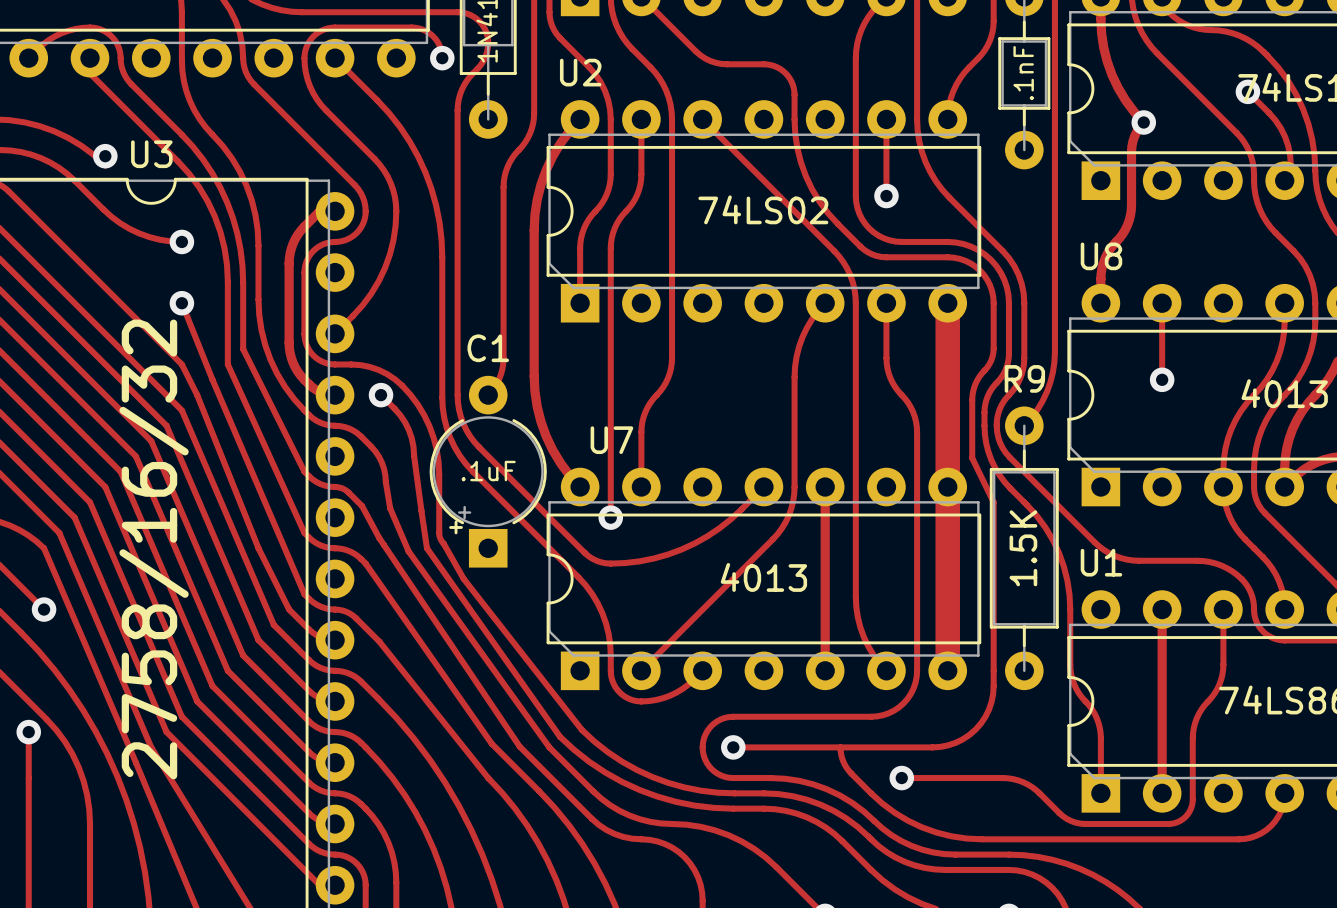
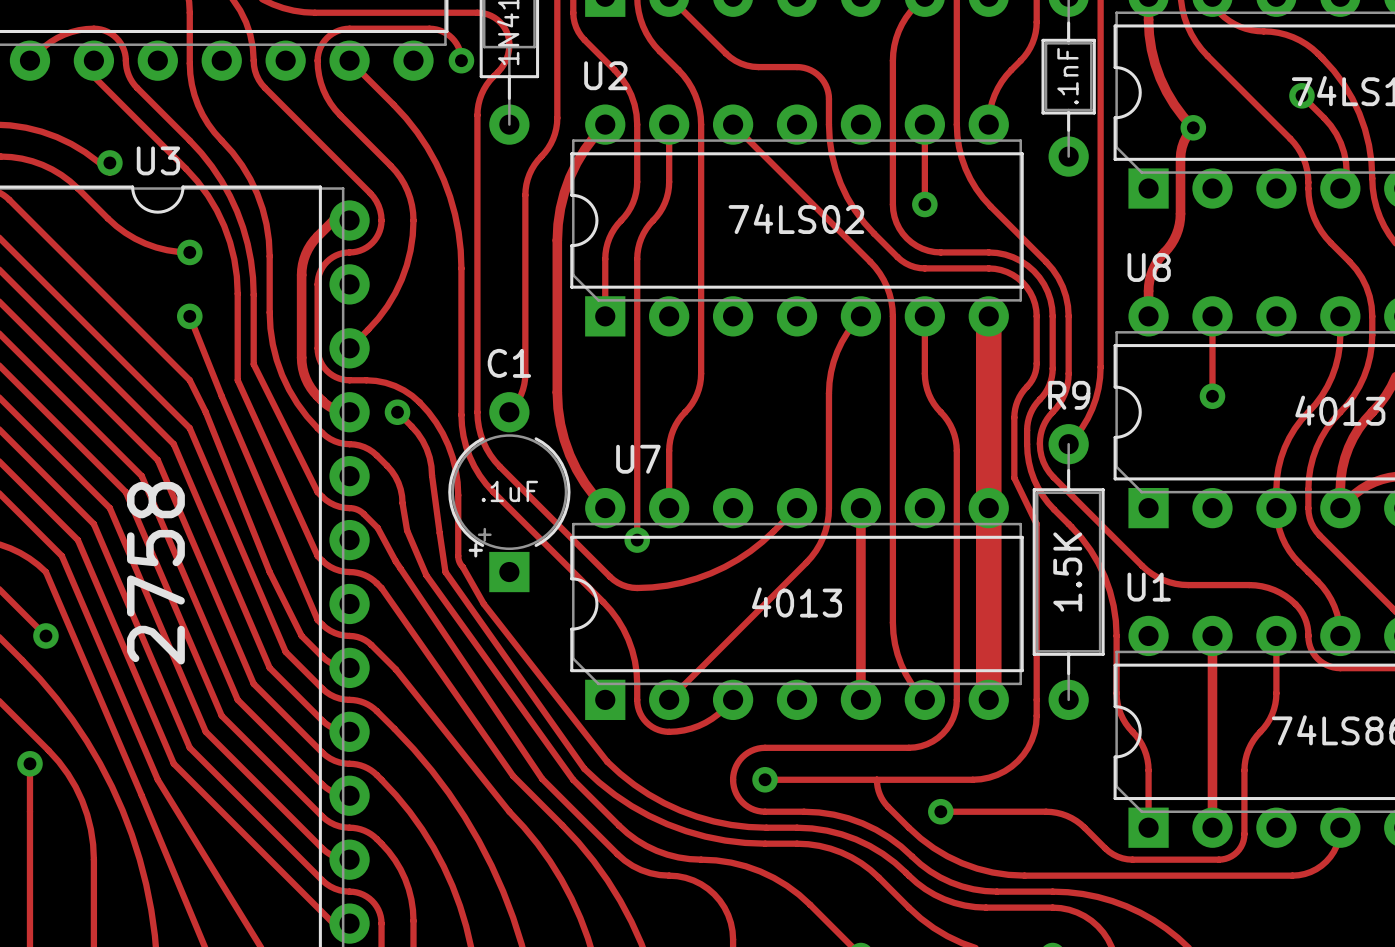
U3 value: 2758/16/32 (154, 549) -> 2758 (155, 573)

